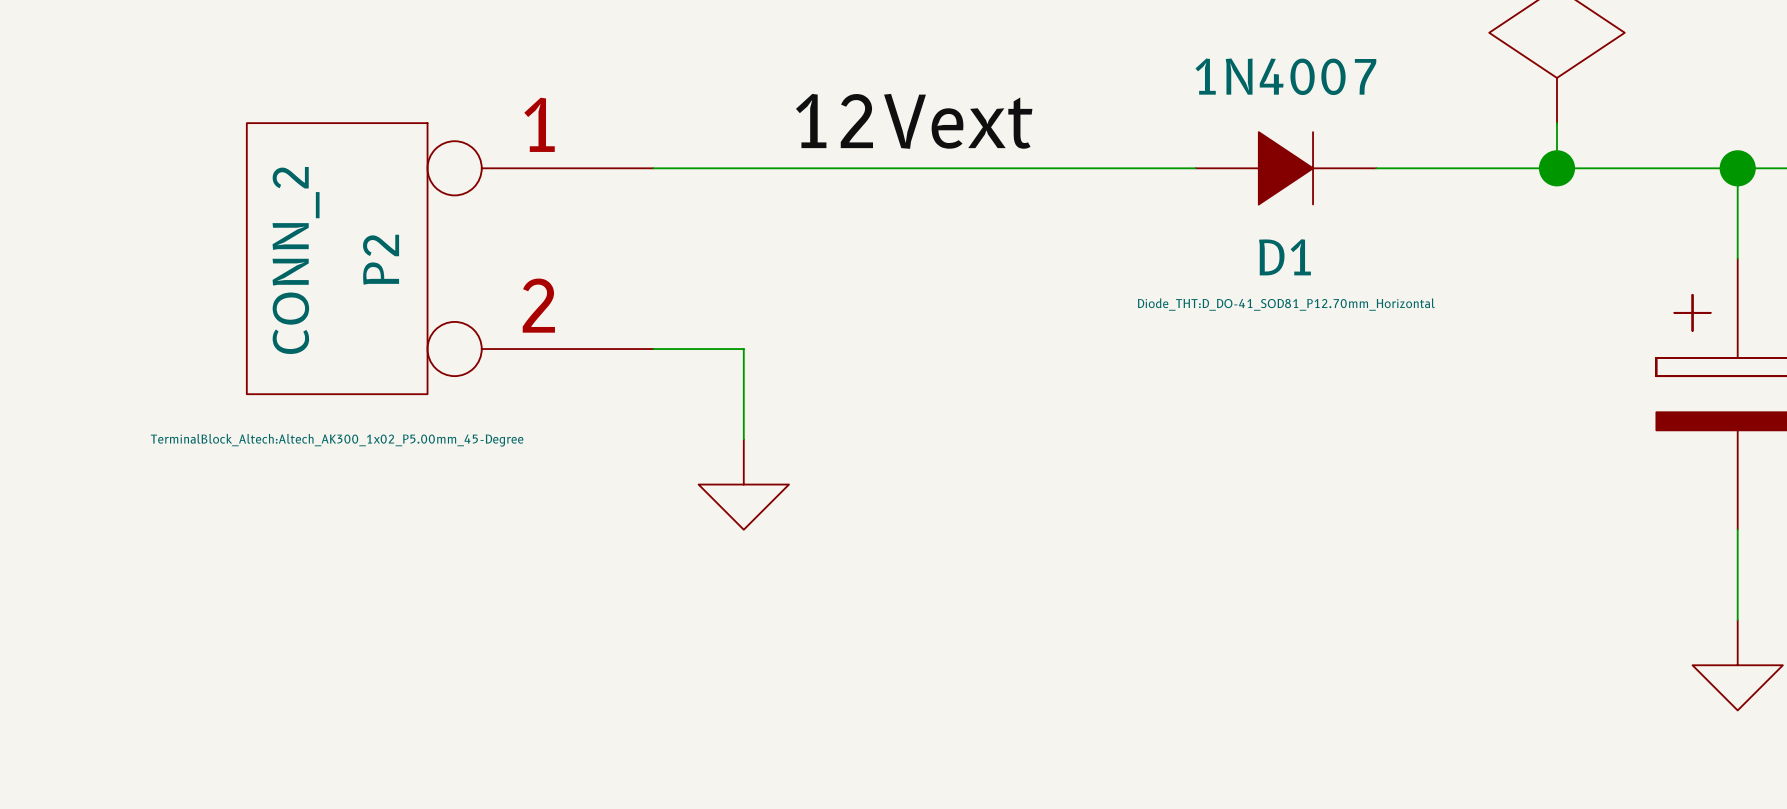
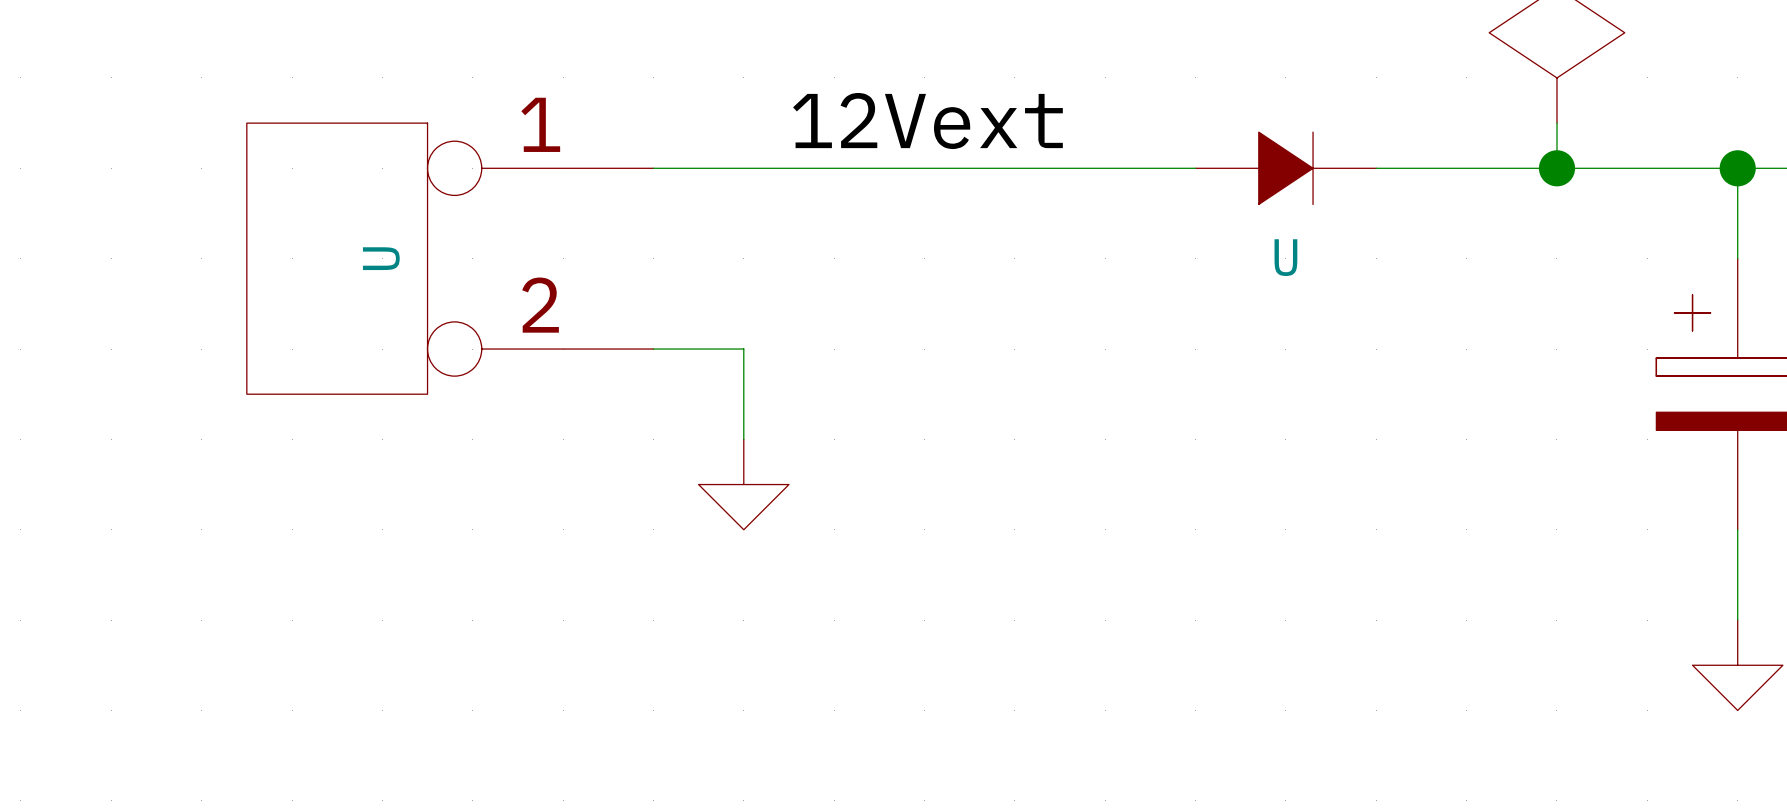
D1 value: 1N4007 (1285, 76) -> none
D1 name: D1 (1284, 257) -> U (1285, 257)
P2 name: P2 (381, 259) -> U (381, 258)
P2 value: CONN_2 (296, 260) -> none
D1 text: Diode_THT:D_DO-41_SOD81_P12.70mm_Horizontal (1286, 304) -> none
P2 text: TerminalBlock_Altech:Altech_AK300_1x02_P5.00mm_45-Degree (337, 440) -> none

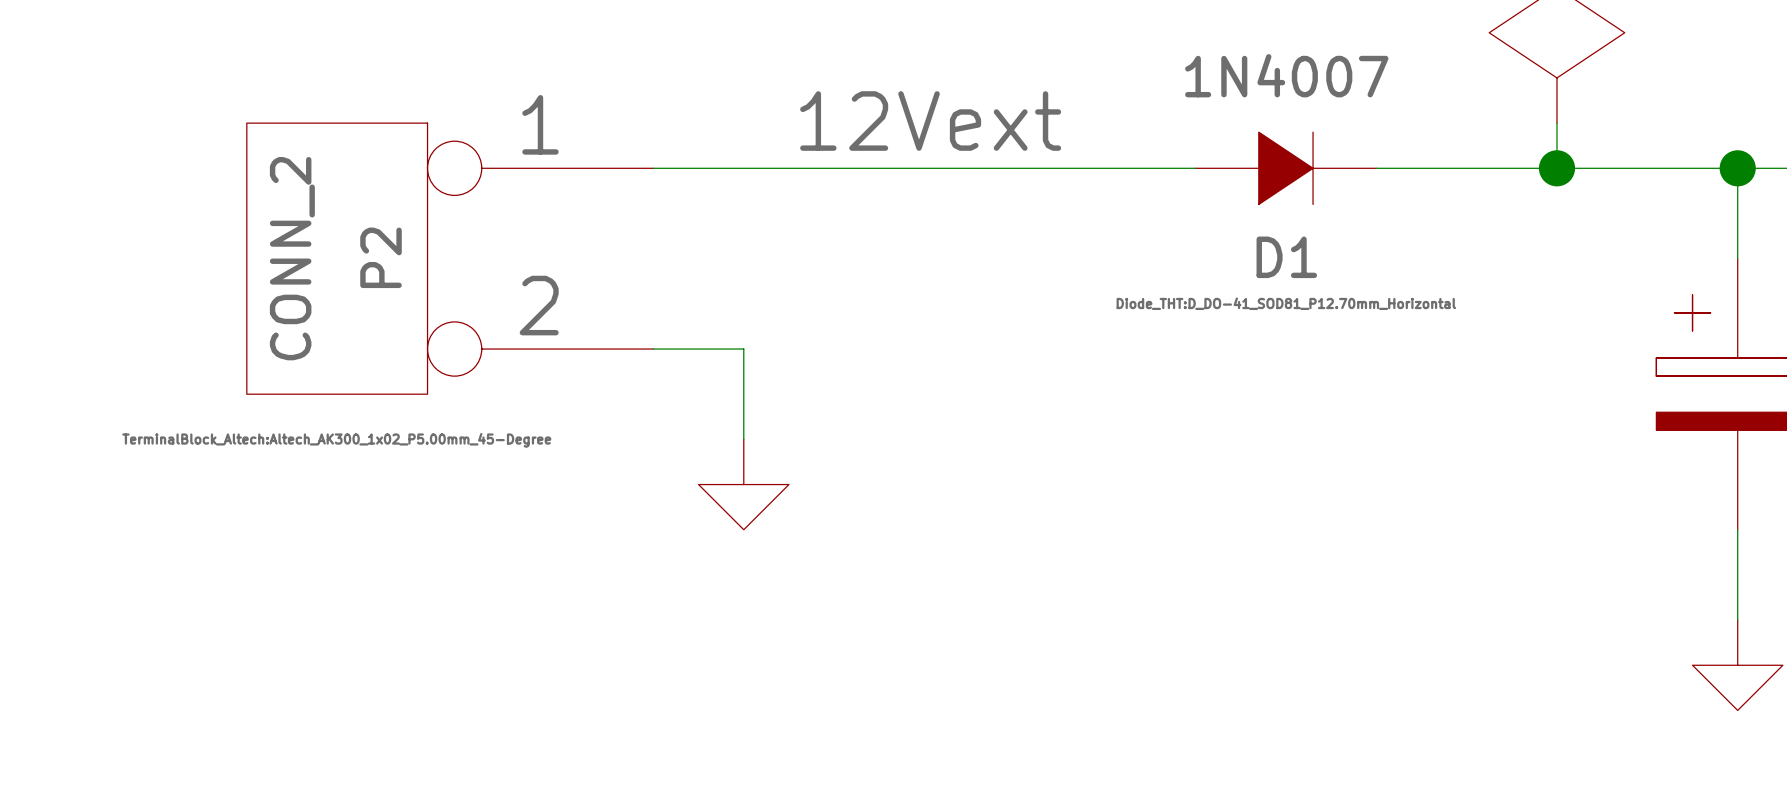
U value: none -> 1N4007 (1286, 75)
U name: U (1285, 257) -> D1 (1286, 257)
U value: none -> CONN_2 (292, 258)
U name: U (381, 258) -> P2 (381, 257)
U text: none -> Diode_THT:D_DO-41_SOD81_P12.70mm_Horizontal (1286, 303)
U text: none -> TerminalBlock_Altech:Altech_AK300_1x02_P5.00mm_45-Degree (336, 440)

